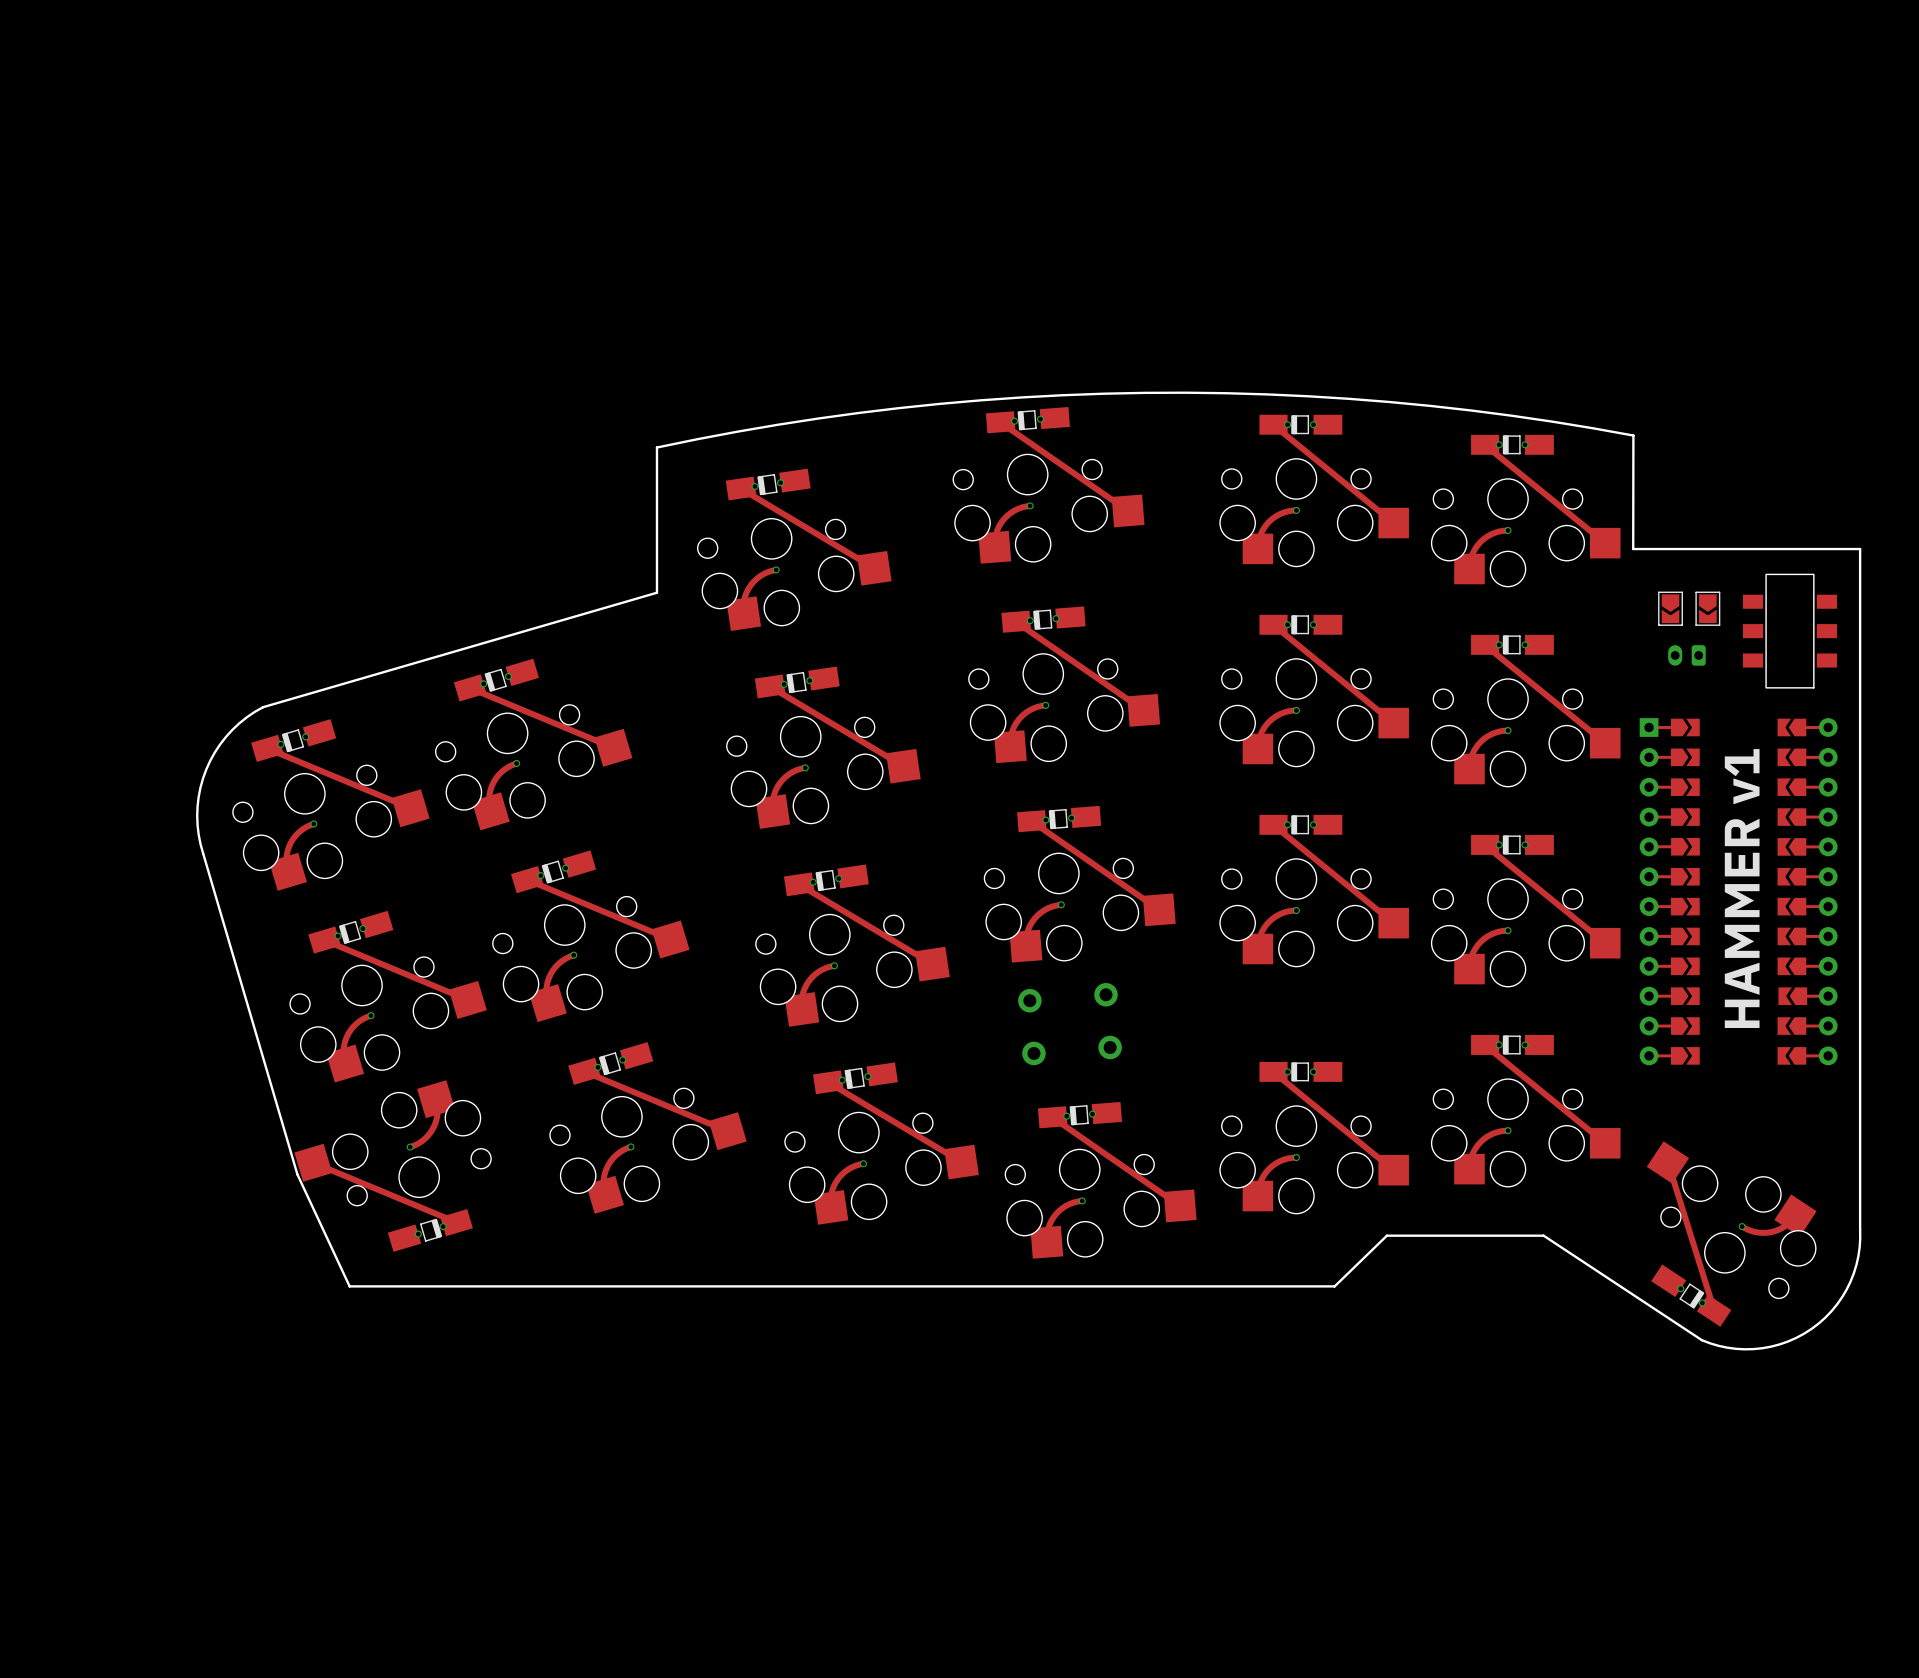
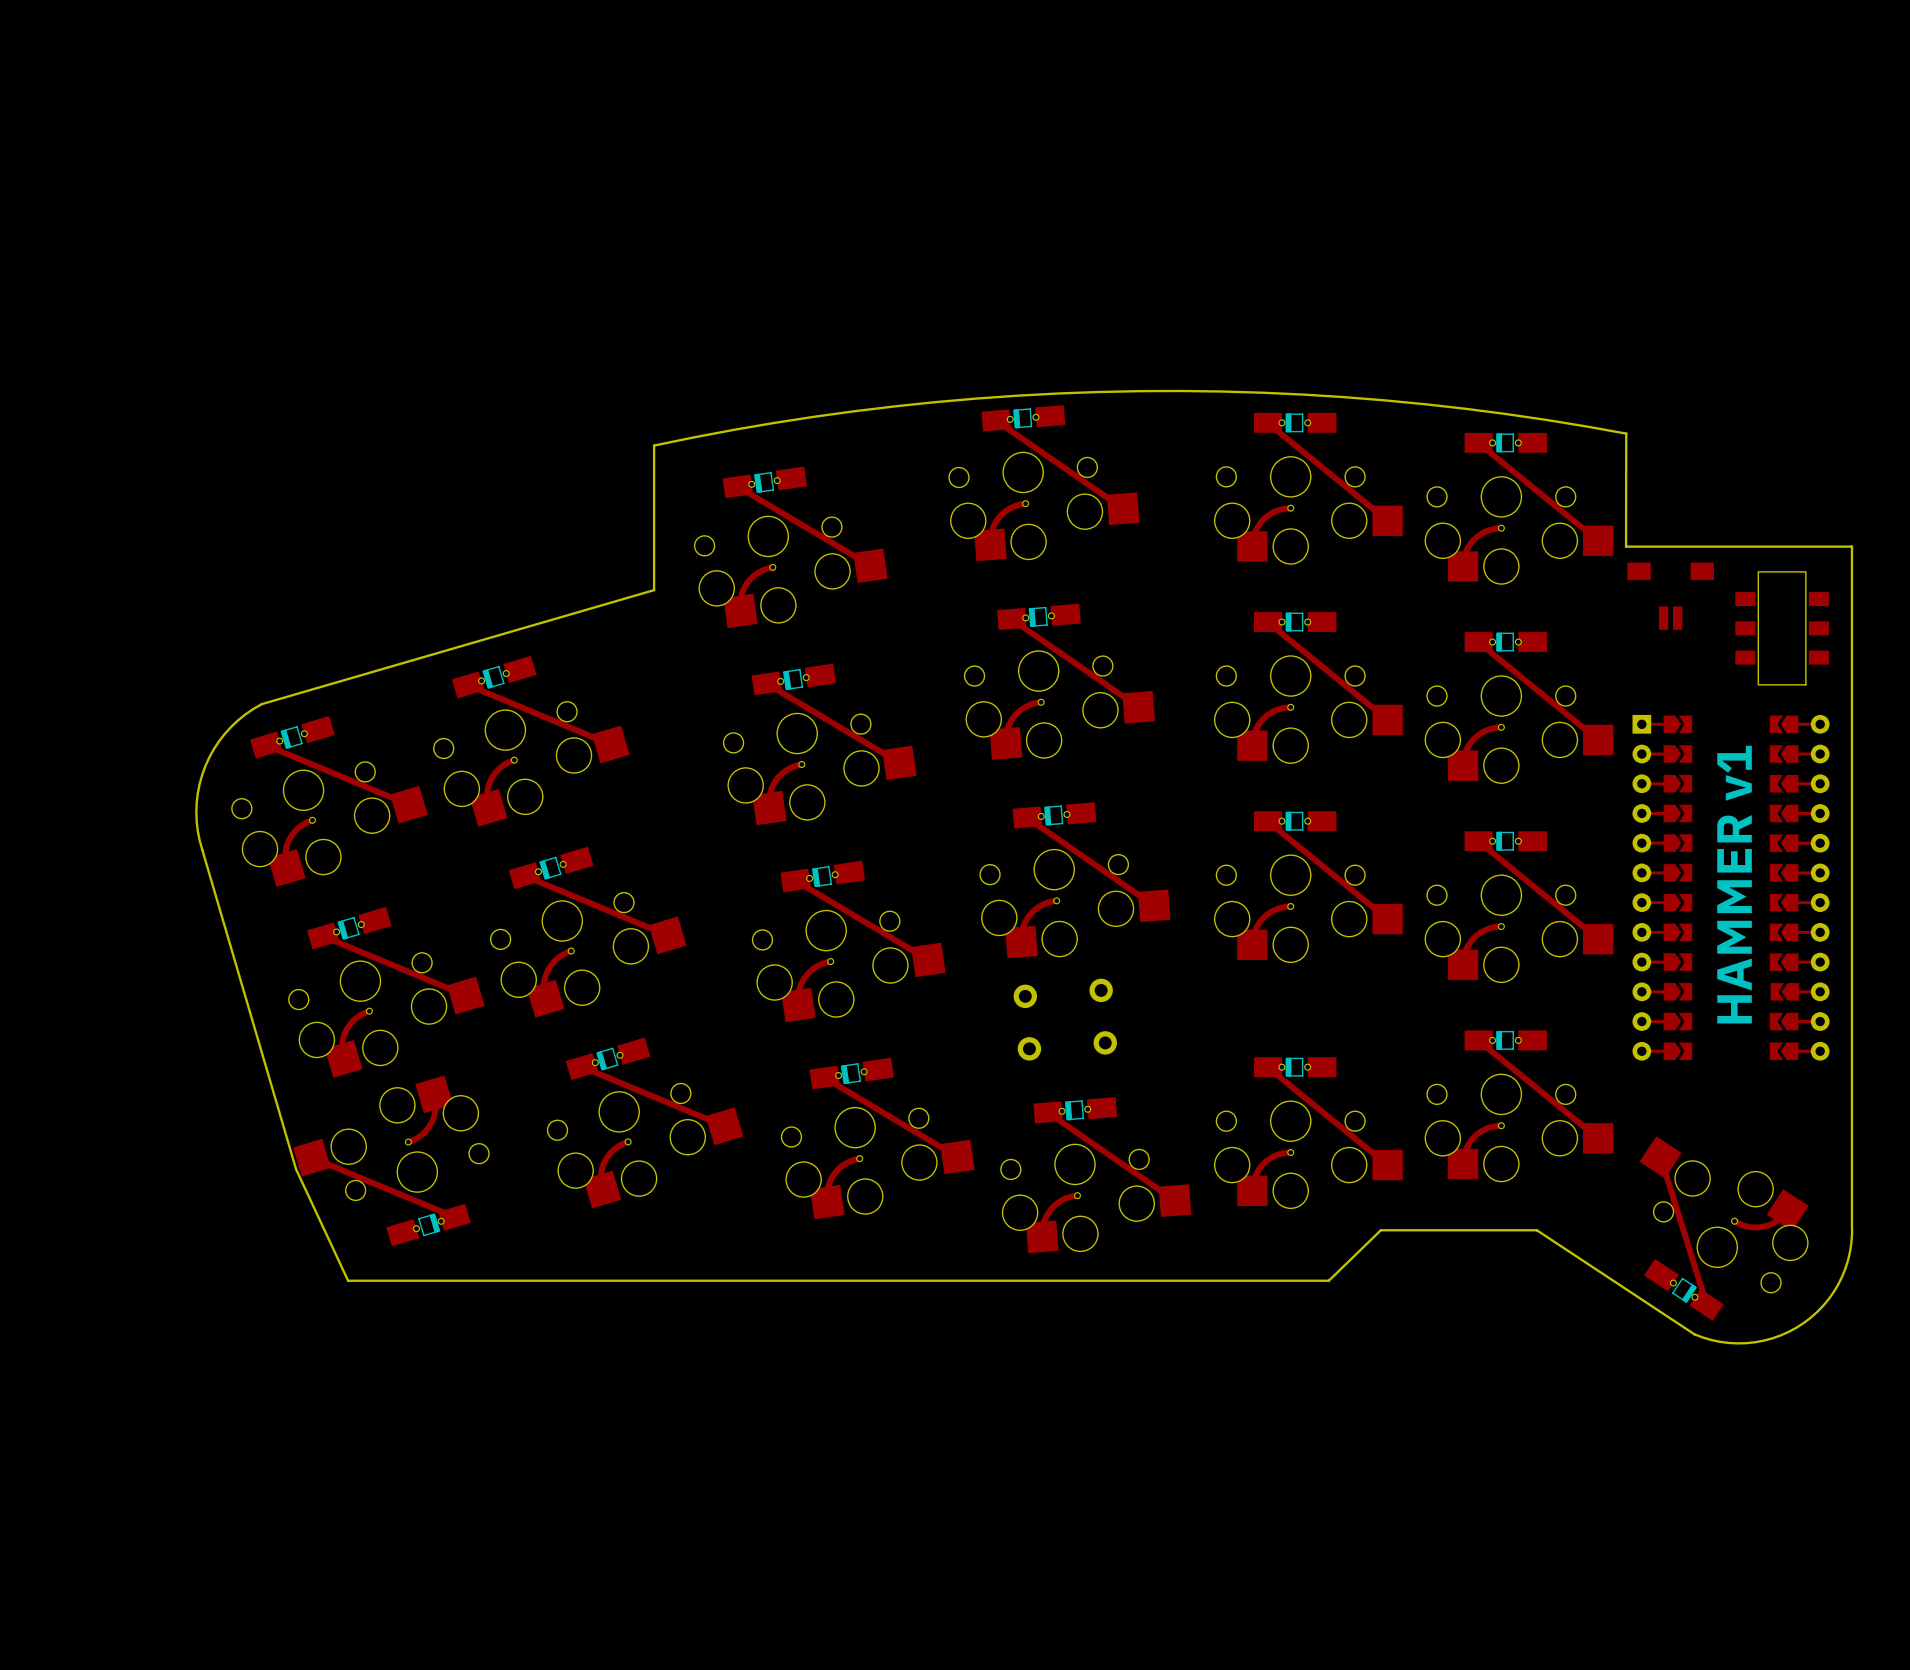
part: none -> (1670, 596)
part: (1670, 608) -> none
part: (1707, 608) -> none
part: (1686, 655) -> none

